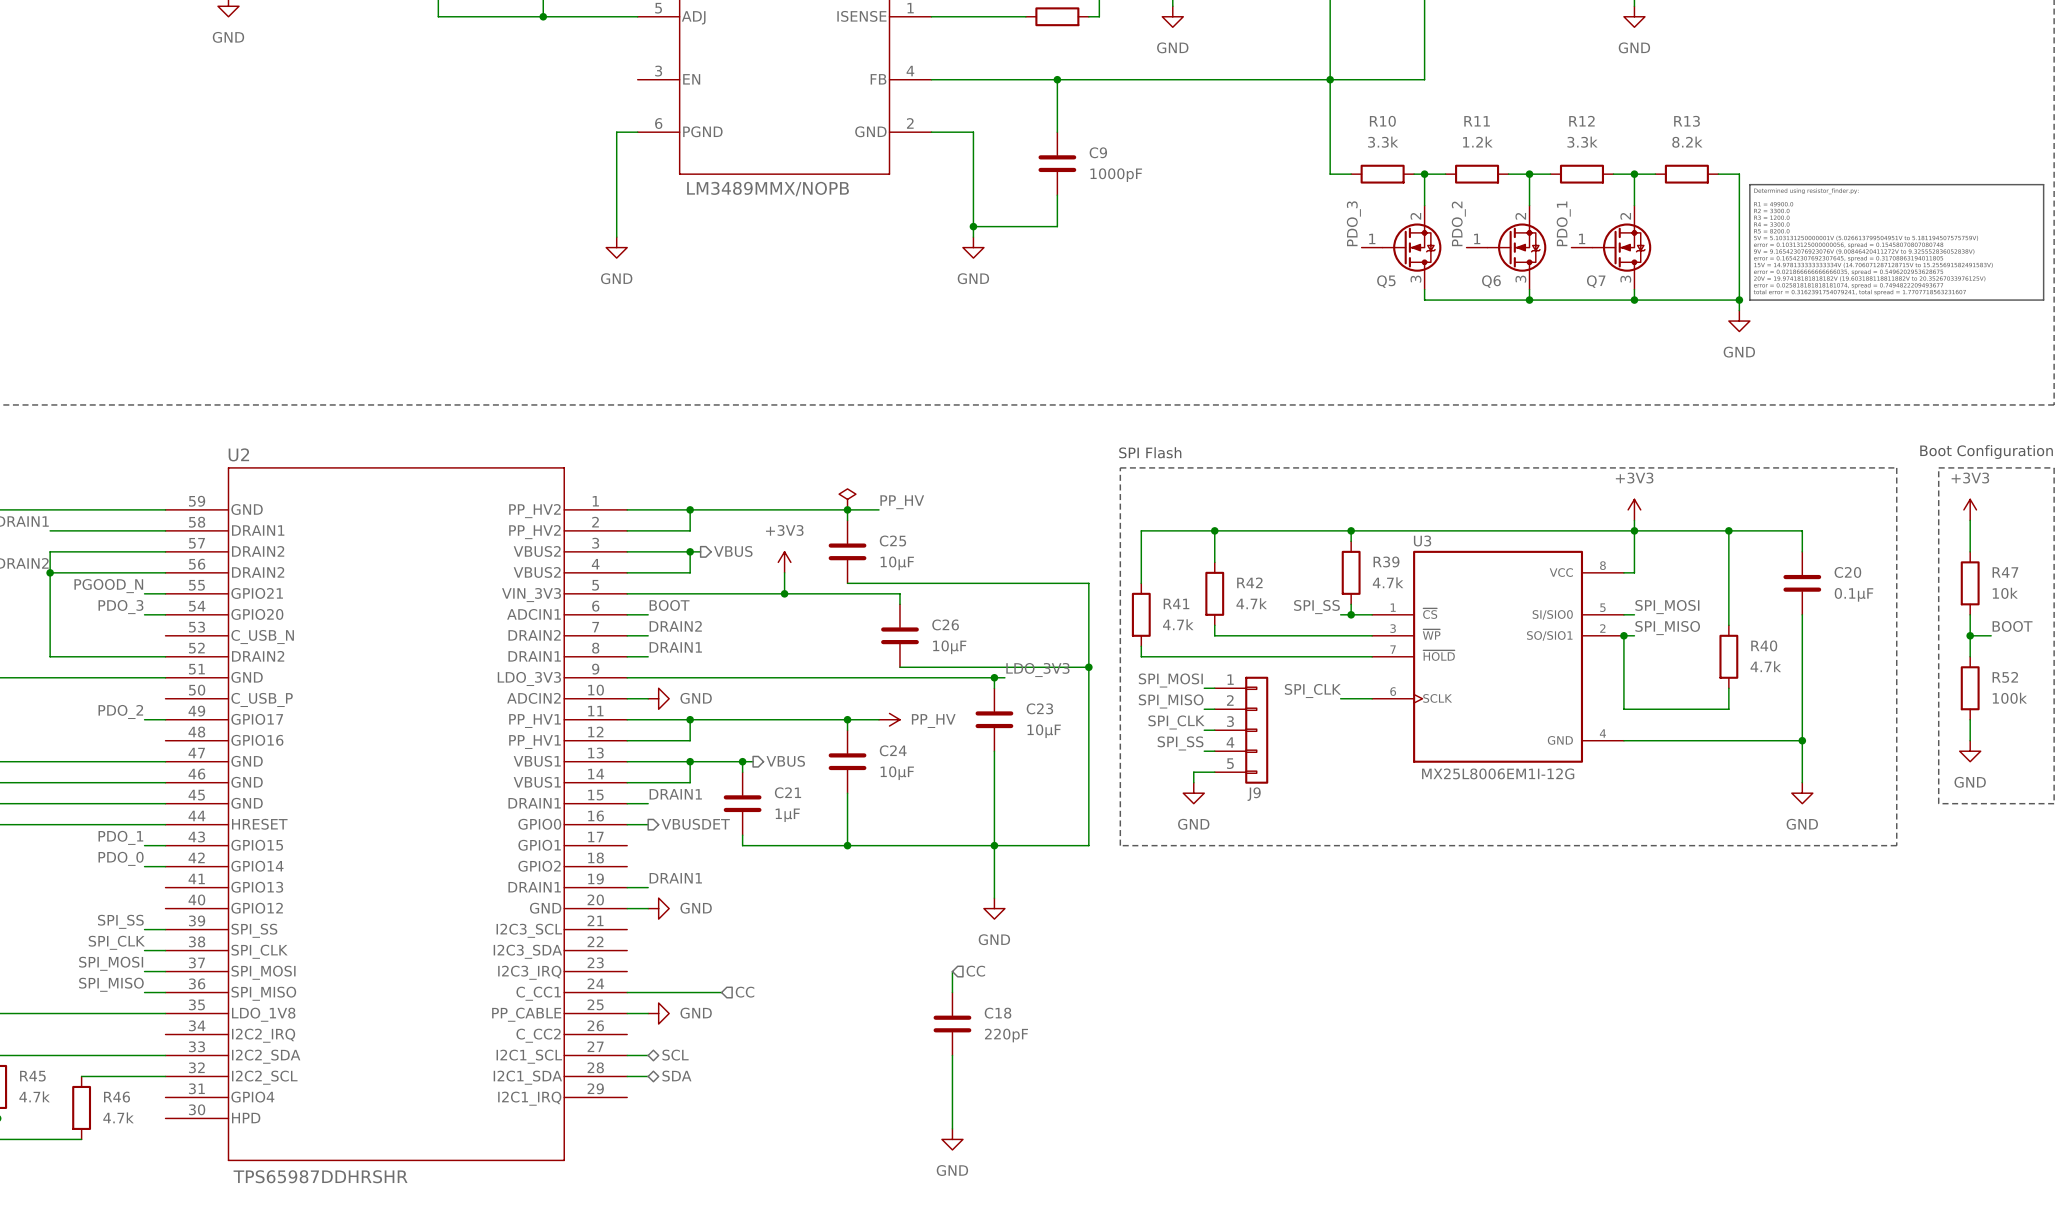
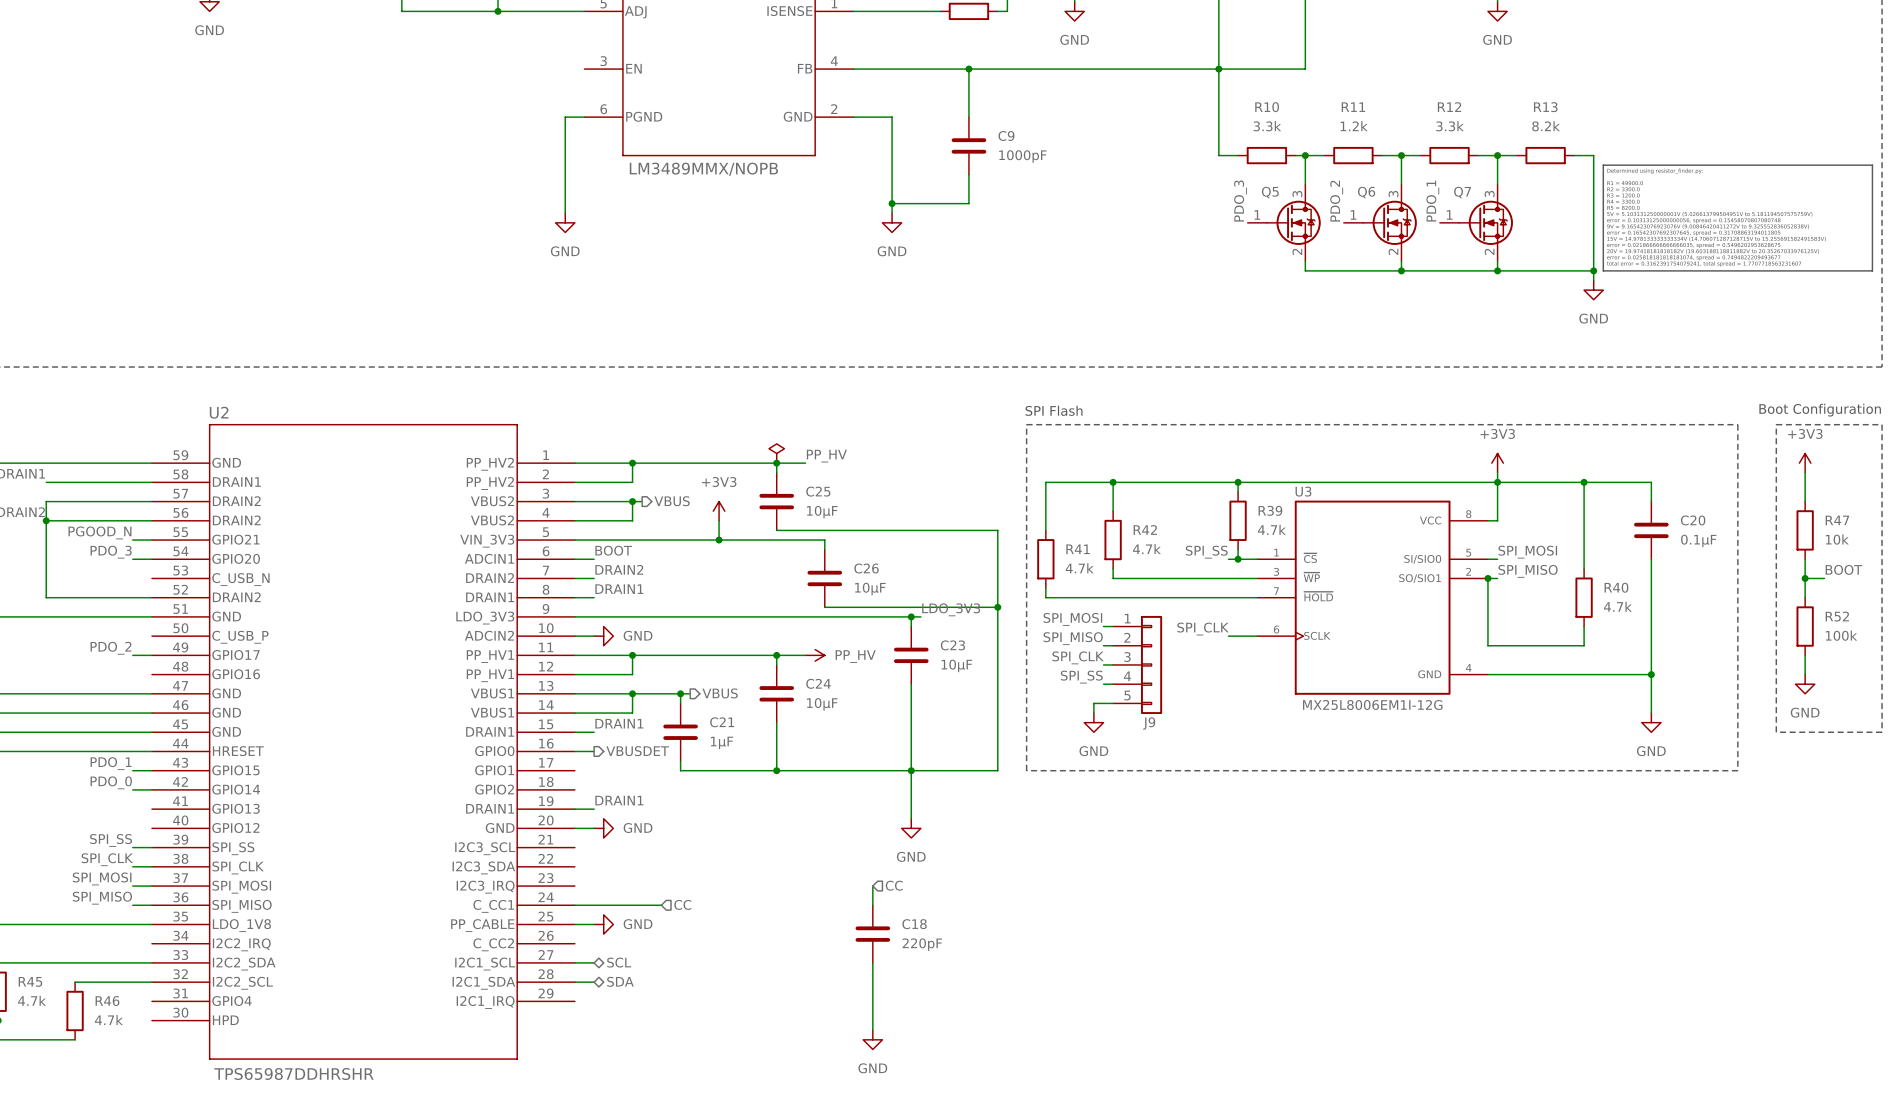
Q5 flip: as is (1412, 247) -> up-down (1293, 222)
Q6 flip: as is (1516, 247) -> up-down (1389, 222)
Q7 flip: as is (1621, 247) -> up-down (1486, 222)

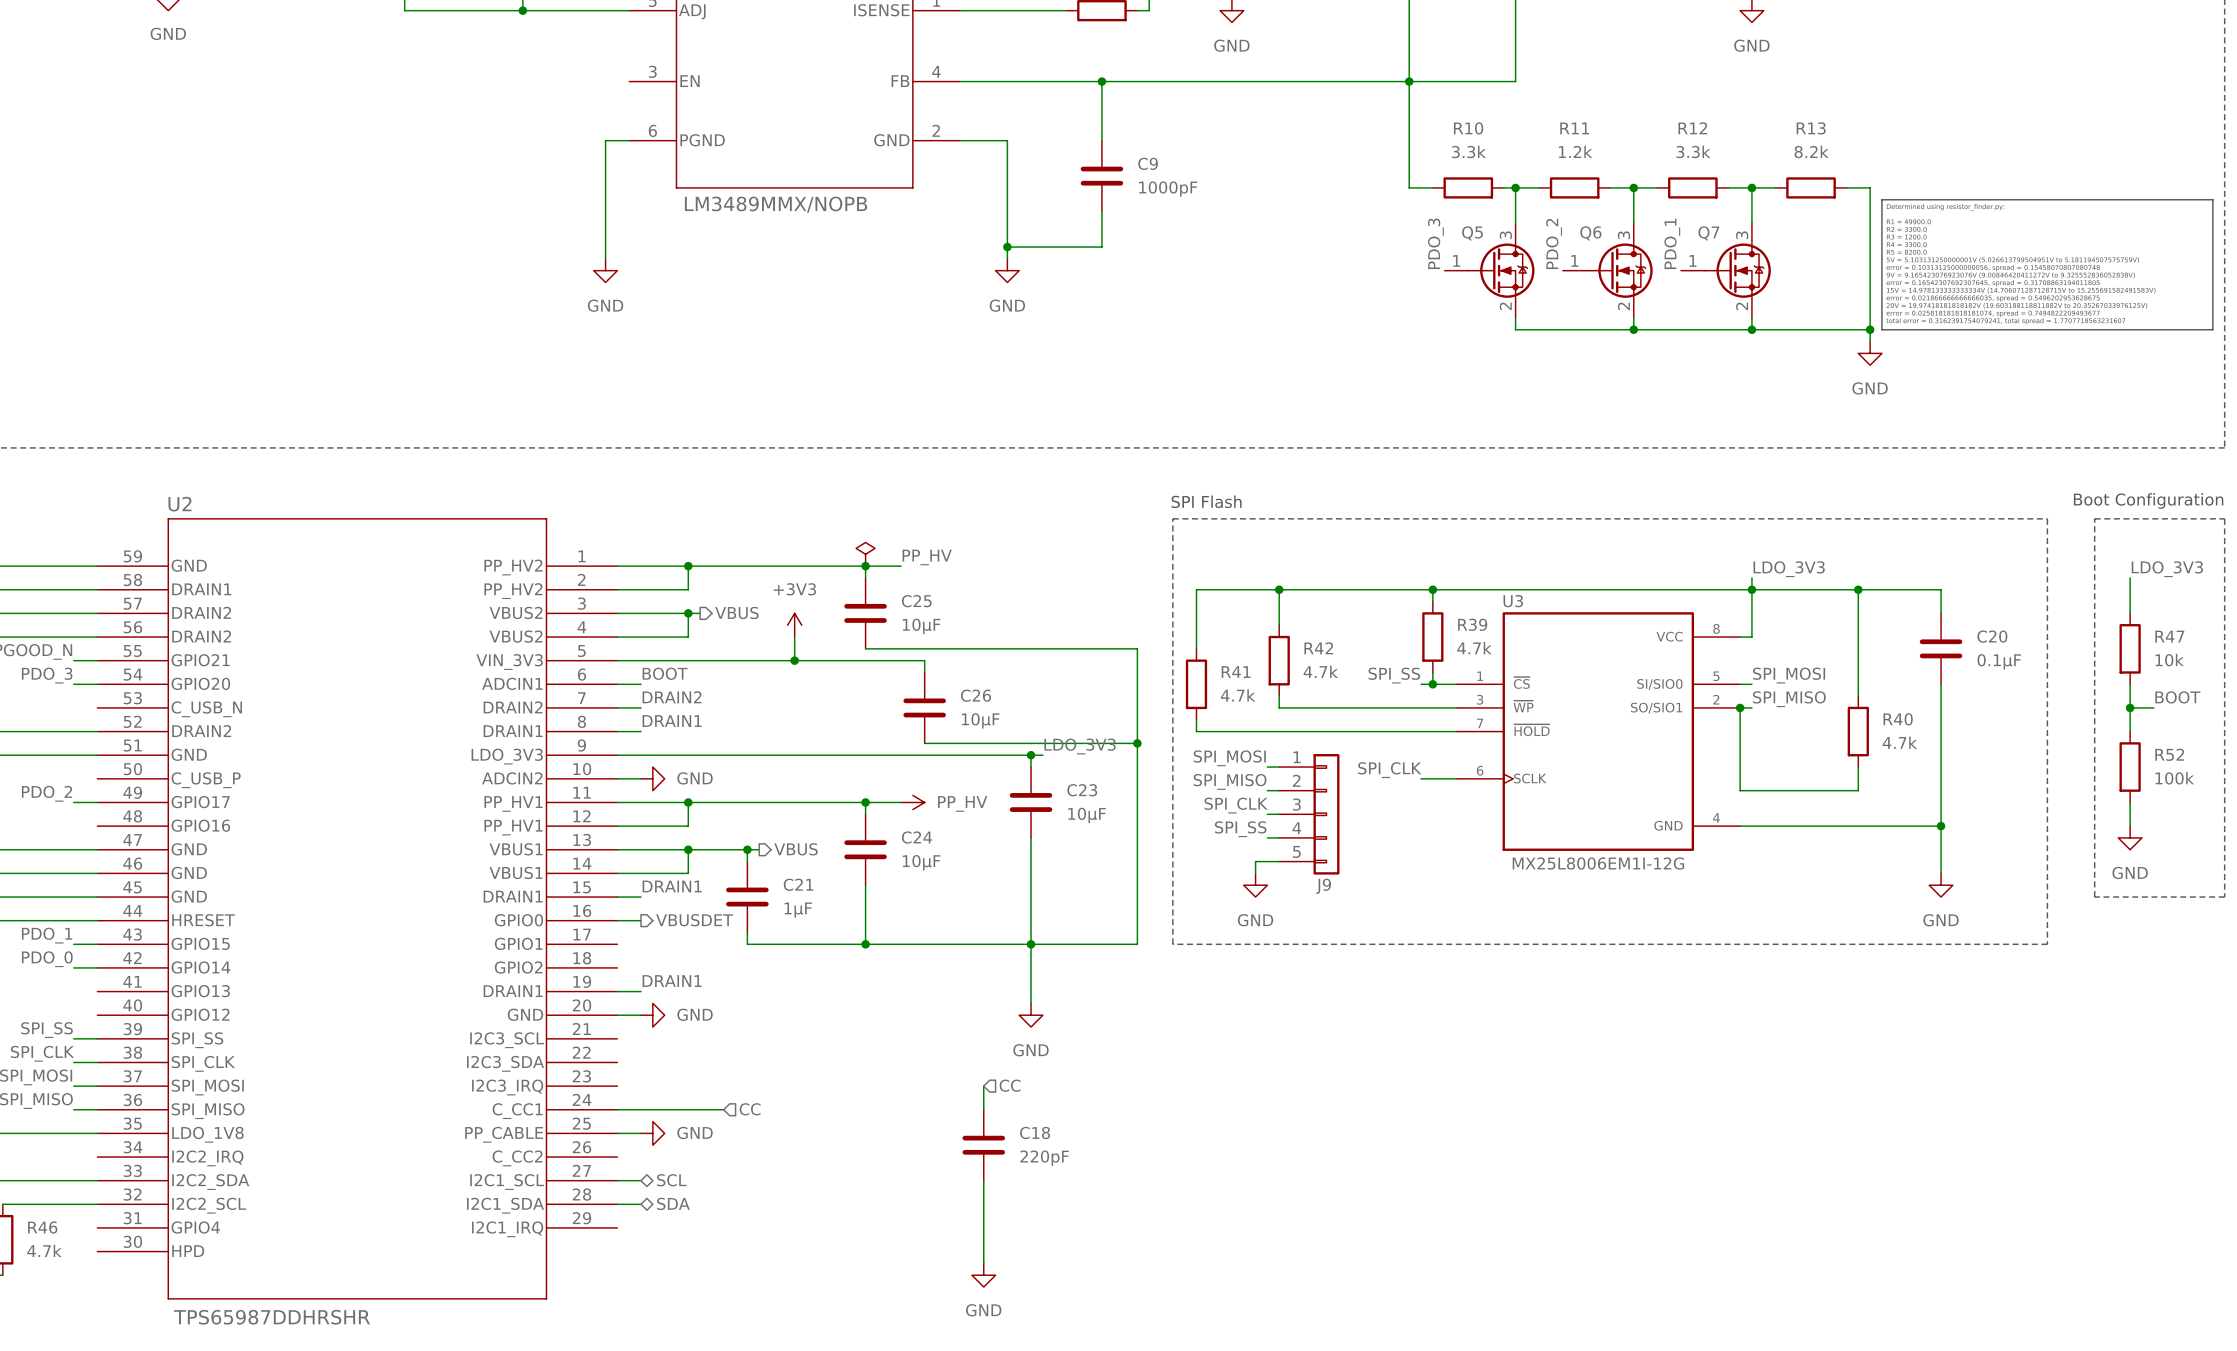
power symbol: +3V3 (1497, 463) -> none
power symbol: +3V3 (1805, 463) -> none
label: none -> LDO_3V3 (1789, 569)
label: none -> LDO_3V3 (2167, 569)

